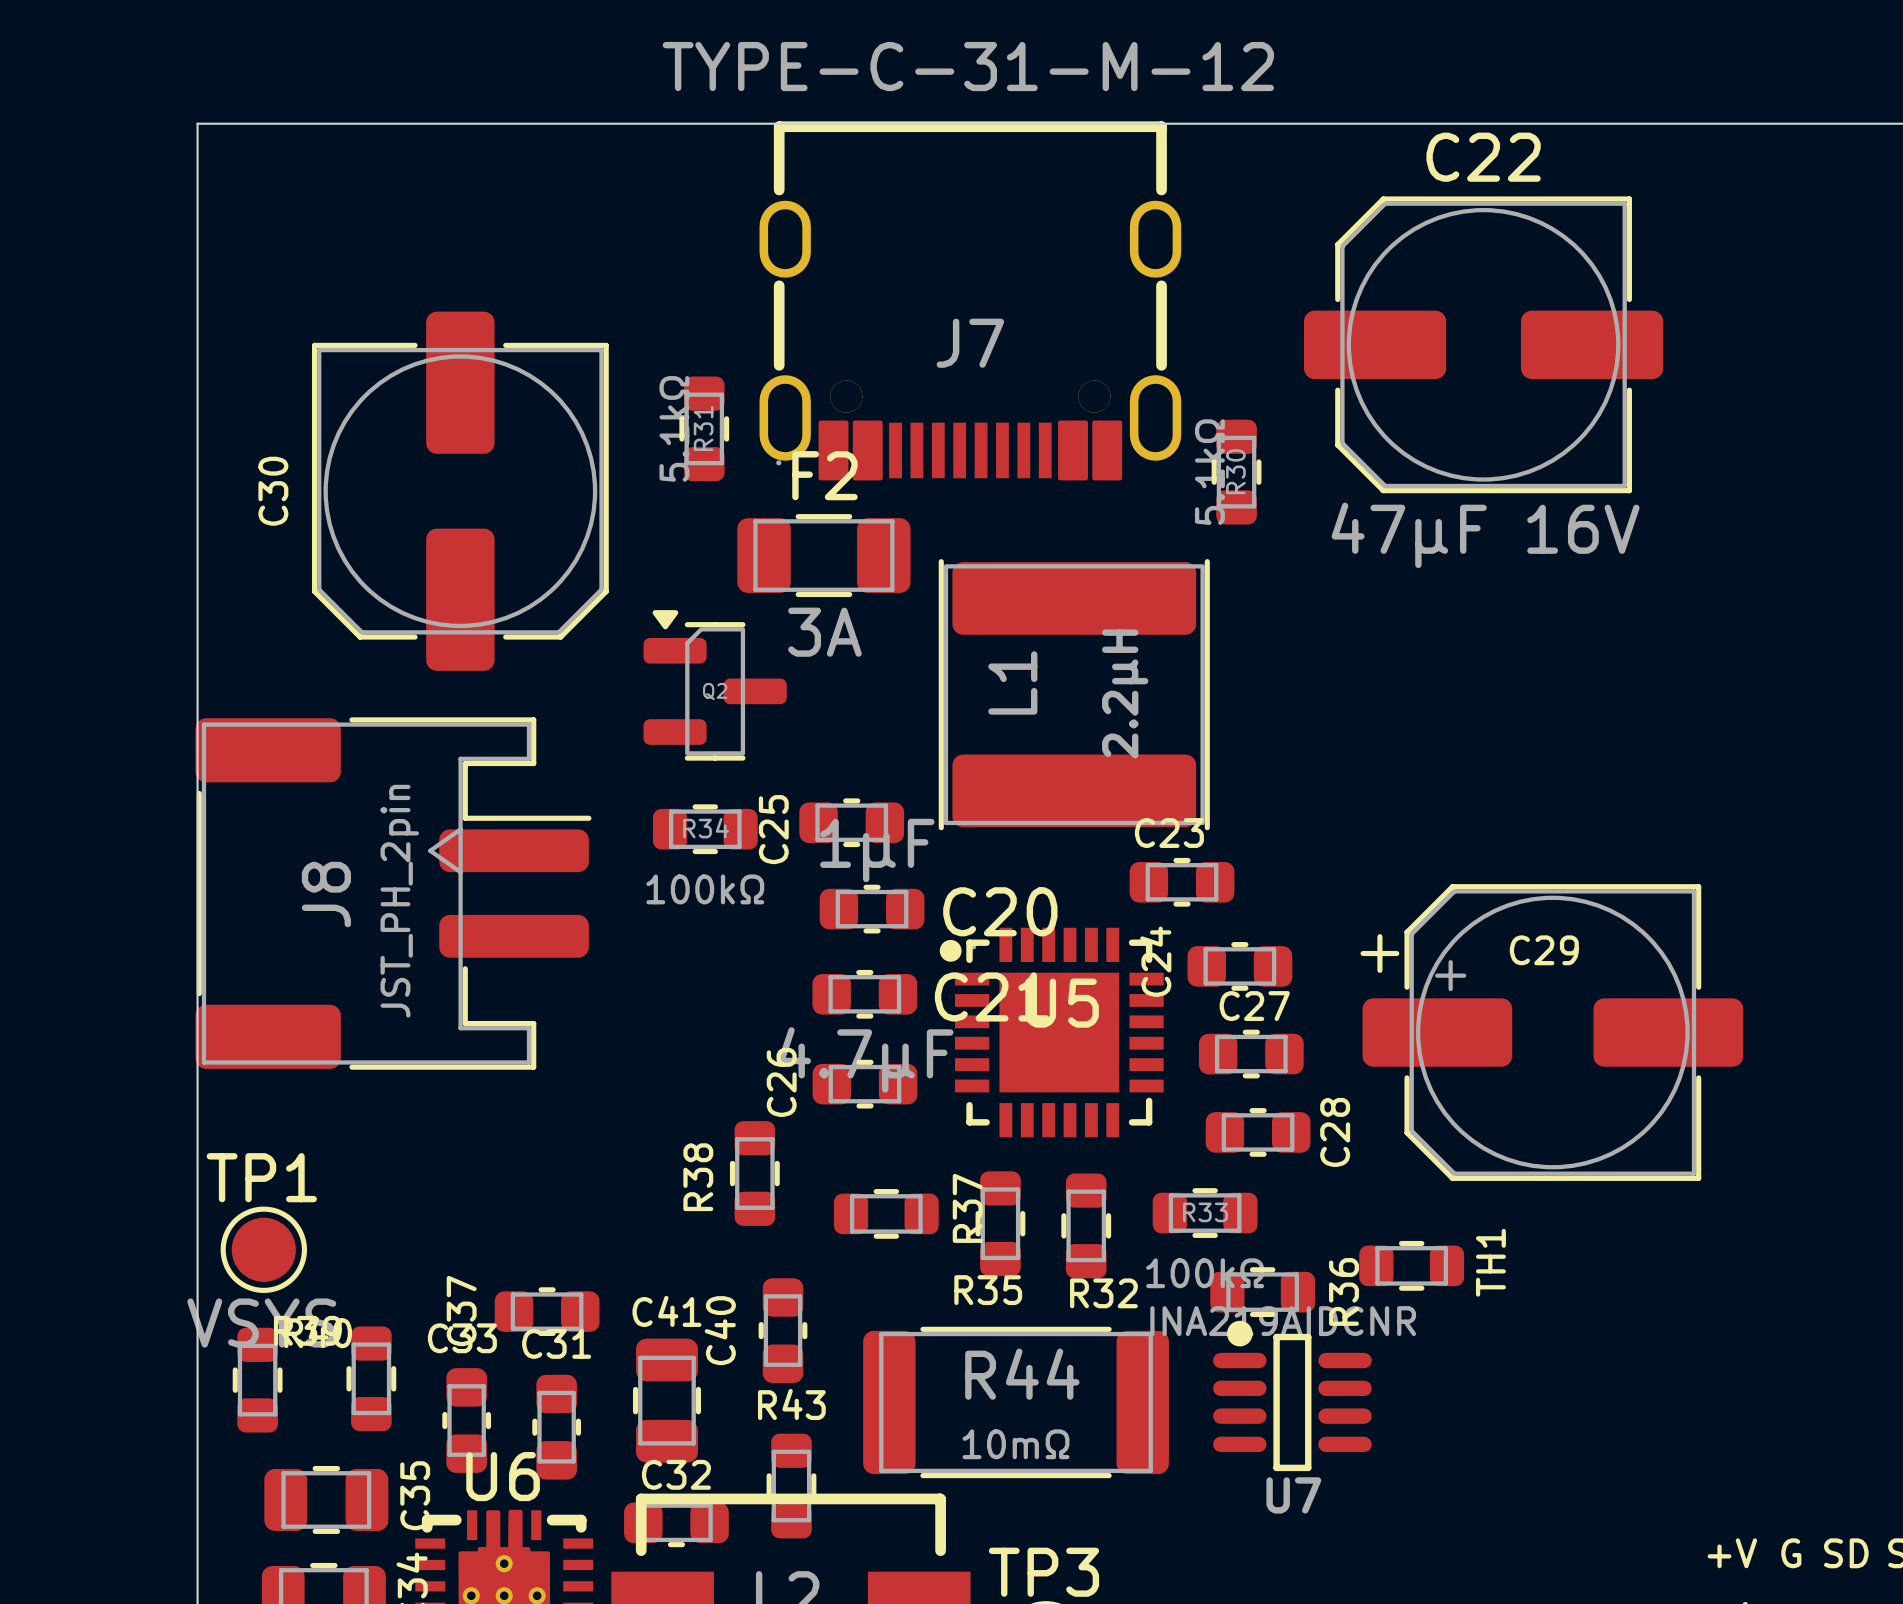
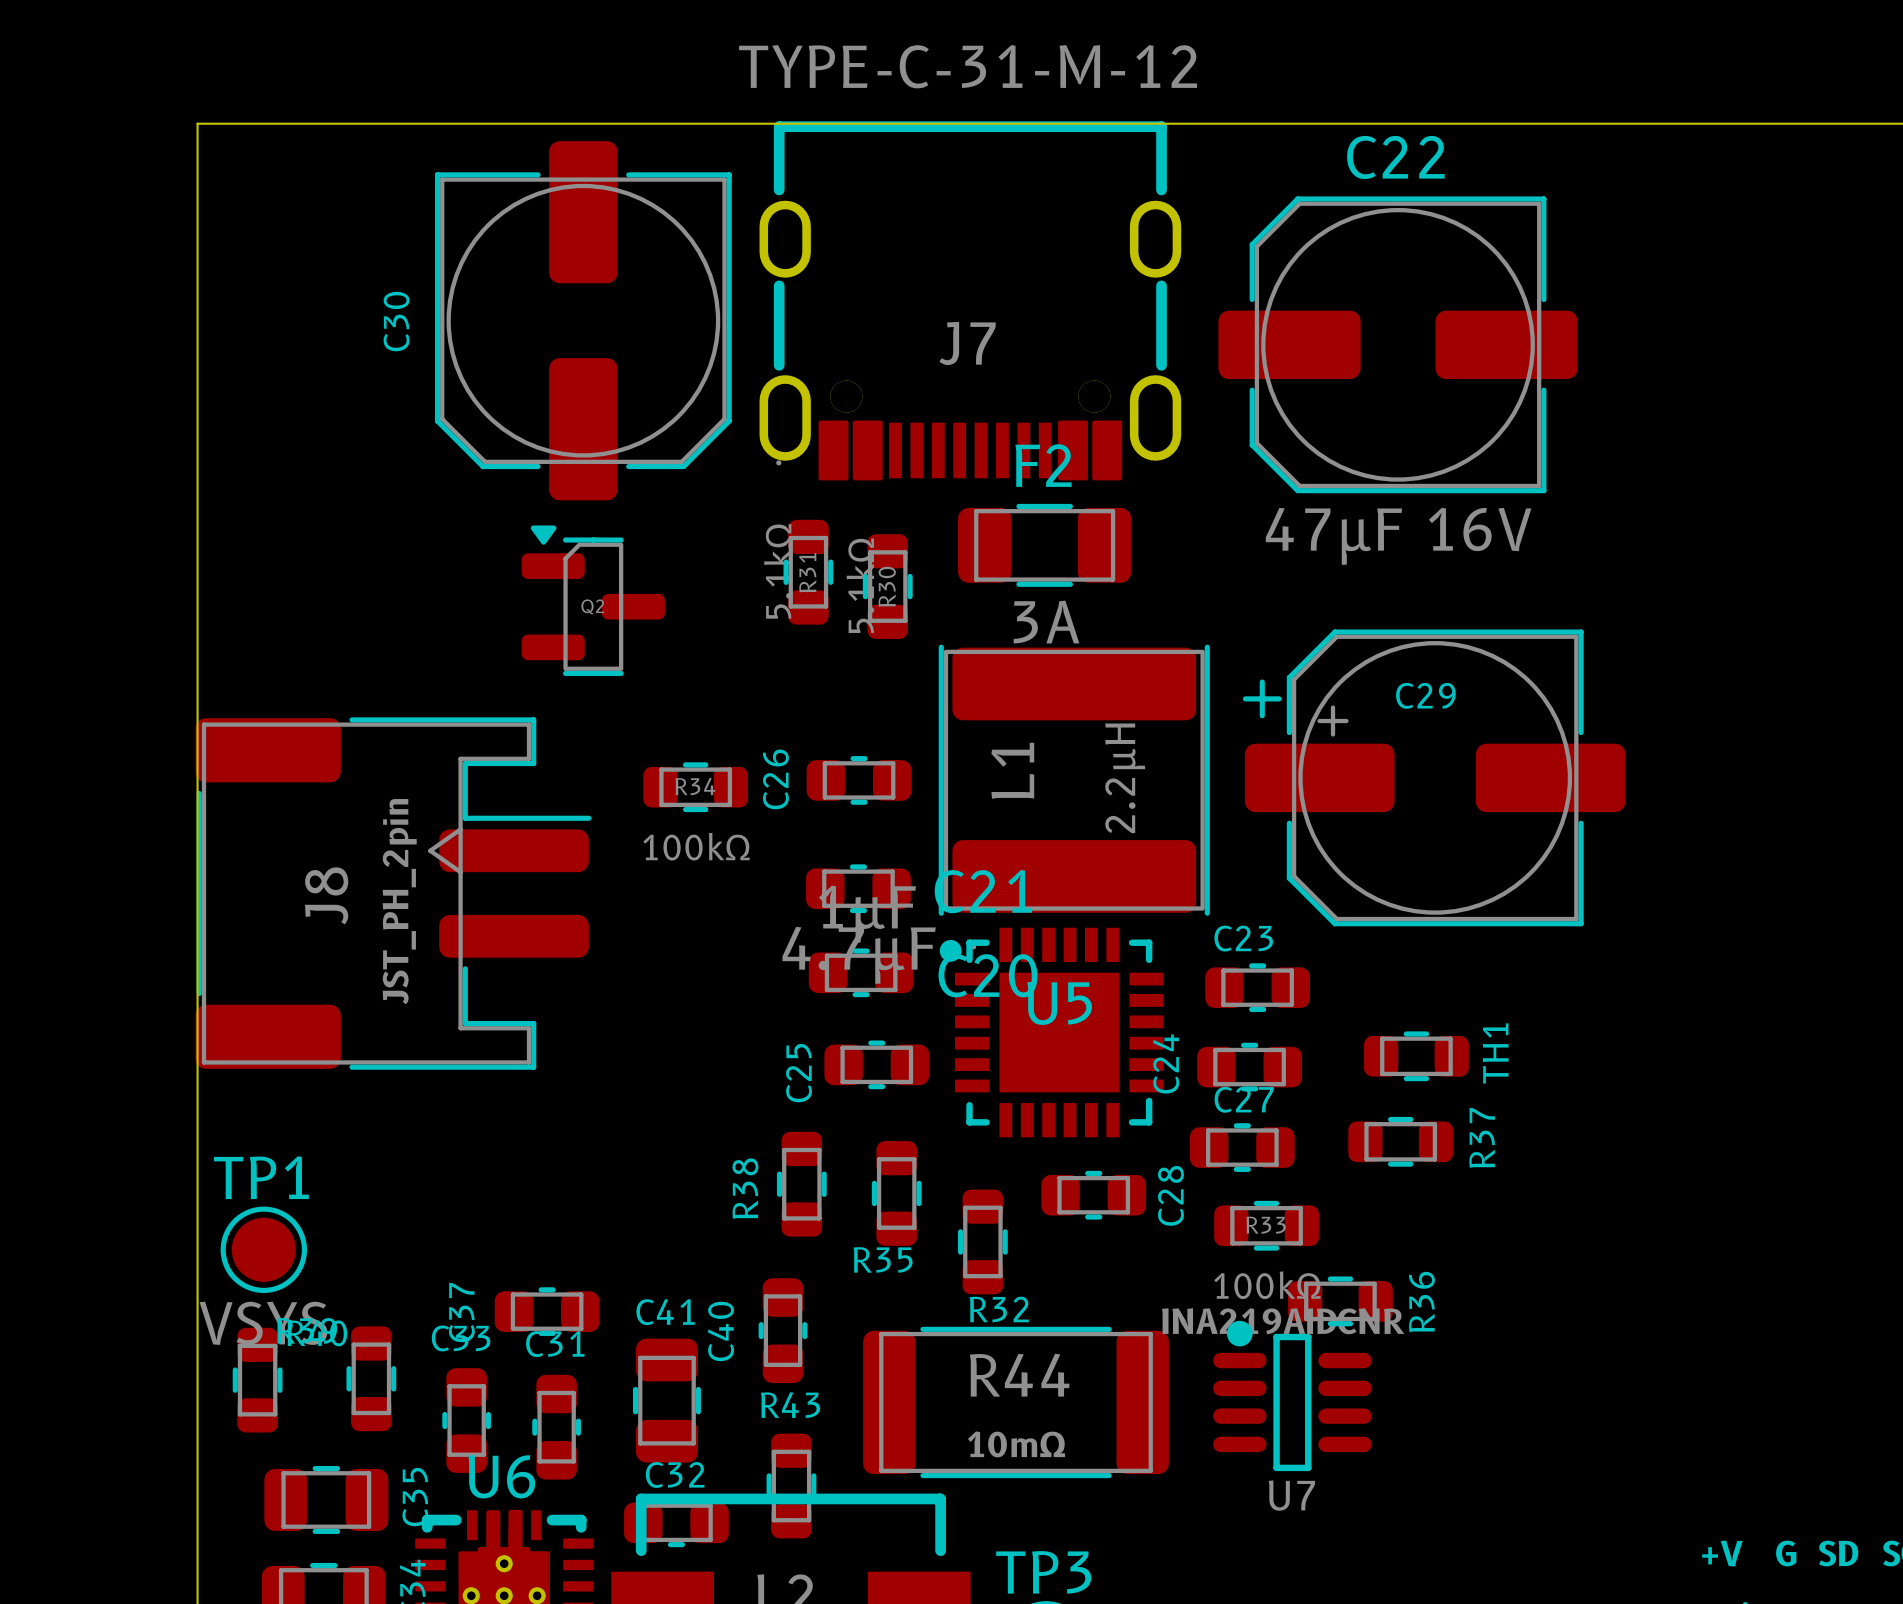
C22 position: (1483, 344) -> (1398, 344)
R31 position: (704, 428) -> (808, 572)
R30 position: (1236, 472) -> (887, 586)
C30 position: (460, 491) -> (583, 320)
F2 position: (823, 555) -> (1044, 545)
Q2 position: (715, 685) -> (593, 600)
L1 position: (1074, 694) -> (1074, 780)
C25 position: (851, 822) -> (876, 1064)
R34 position: (705, 829) -> (695, 787)
C23 position: (1182, 882) -> (1257, 987)
C20 position: (872, 909) -> (861, 972)
C24 position: (1239, 966) -> (1249, 1067)
C21 position: (864, 994) -> (858, 888)
C29 position: (1551, 1032) -> (1434, 777)
C27 position: (1251, 1054) -> (1242, 1147)
C26 position: (864, 1084) -> (859, 780)
C28 position: (1258, 1132) -> (1093, 1195)
R38 position: (754, 1173) -> (801, 1184)
R37 position: (886, 1213) -> (1400, 1141)
R33 position: (1205, 1213) -> (1266, 1225)
R35 position: (1000, 1223) -> (896, 1193)
R32 position: (1086, 1225) -> (982, 1241)
TH1 position: (1411, 1265) -> (1416, 1056)
R36 position: (1262, 1292) -> (1340, 1301)

